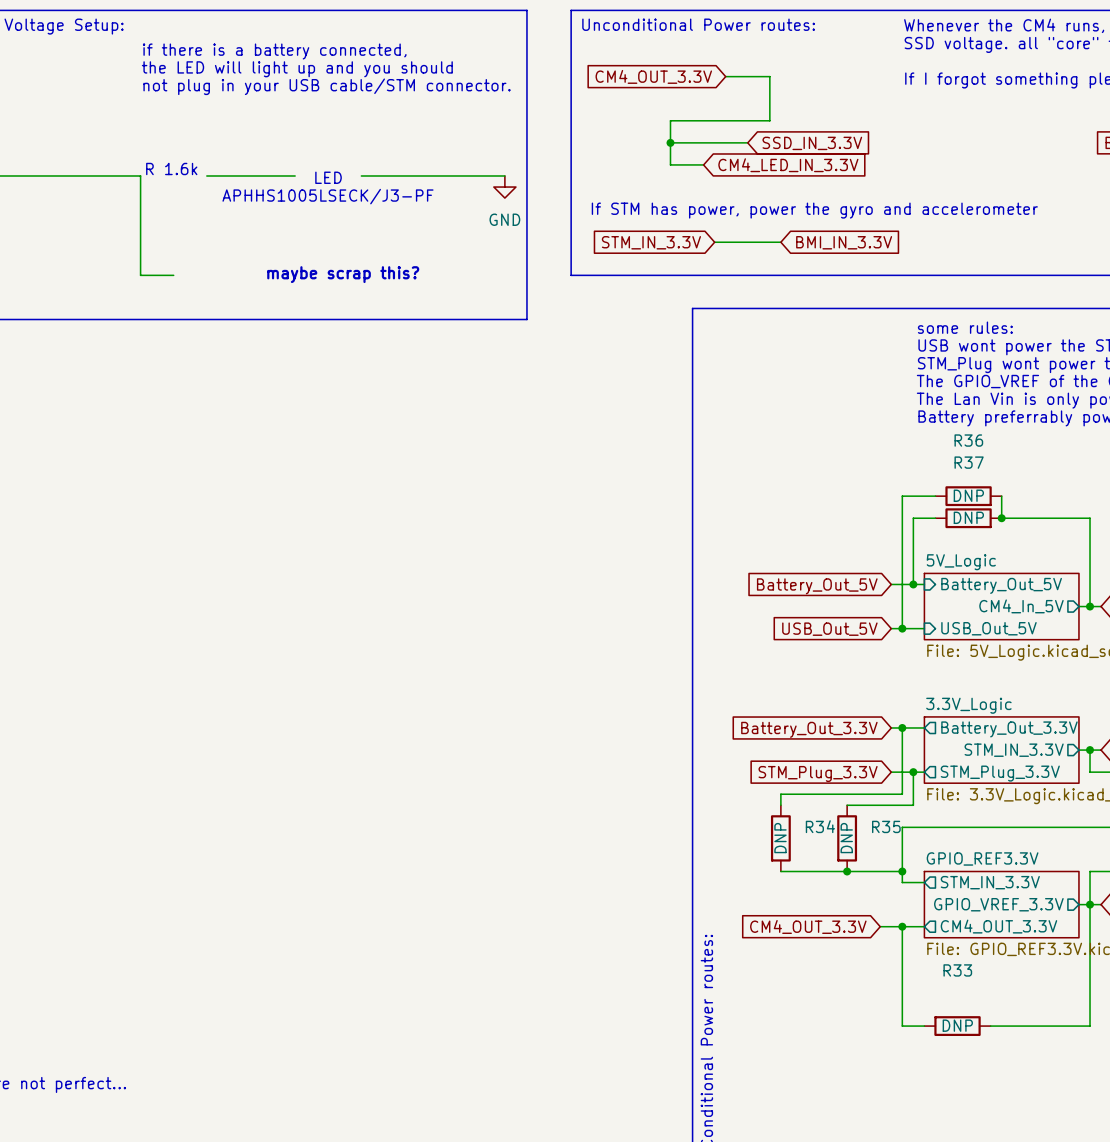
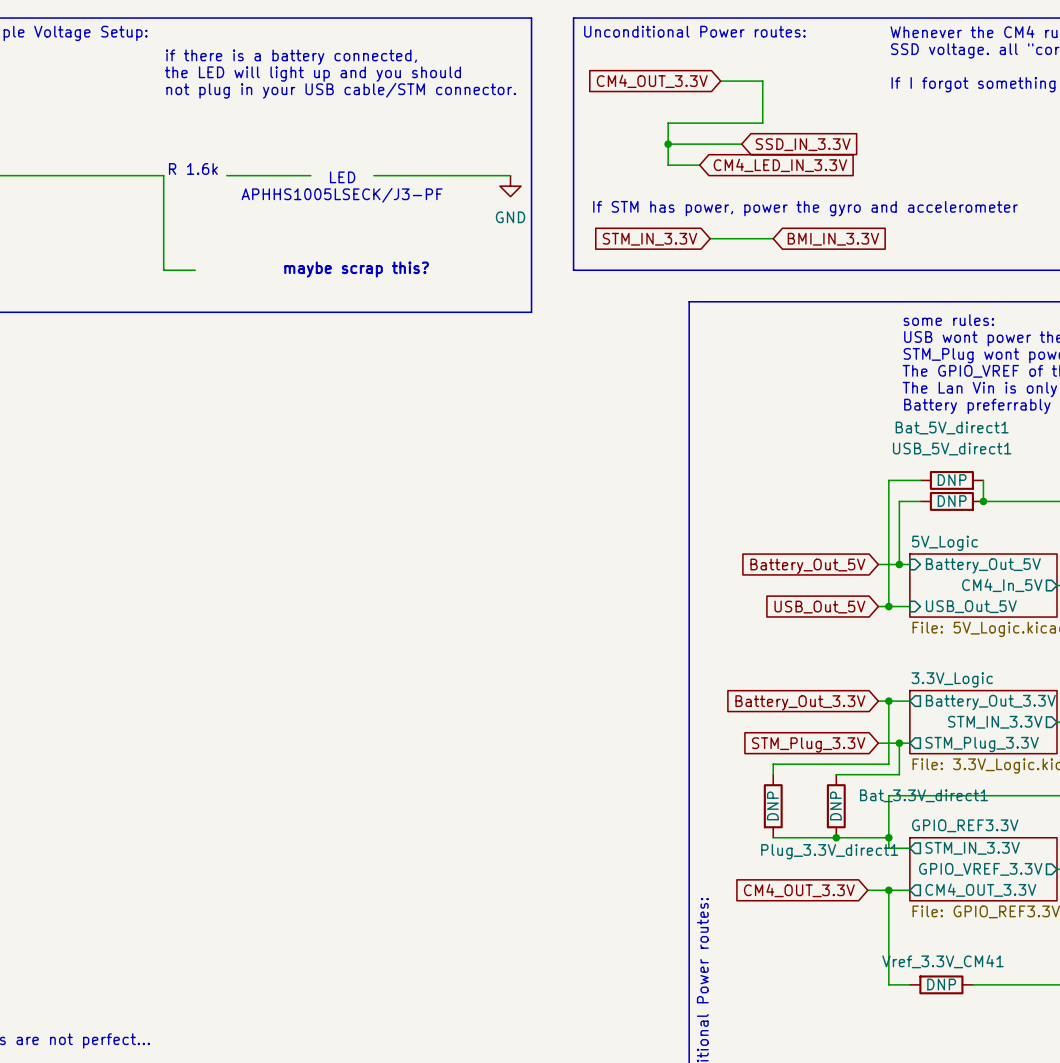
R36 name: R36 (968, 440) -> Bat_5V_direct1 (952, 427)
R37 name: R37 (969, 462) -> USB_5V_direct1 (952, 449)
R34 name: R34 (820, 826) -> Plug_3.3V_direct1 (829, 851)
R35 name: R35 (886, 826) -> Bat_3.3V_direct1 (923, 795)
R33 name: R33 (957, 970) -> Vref_3.3V_CM41 (942, 961)

